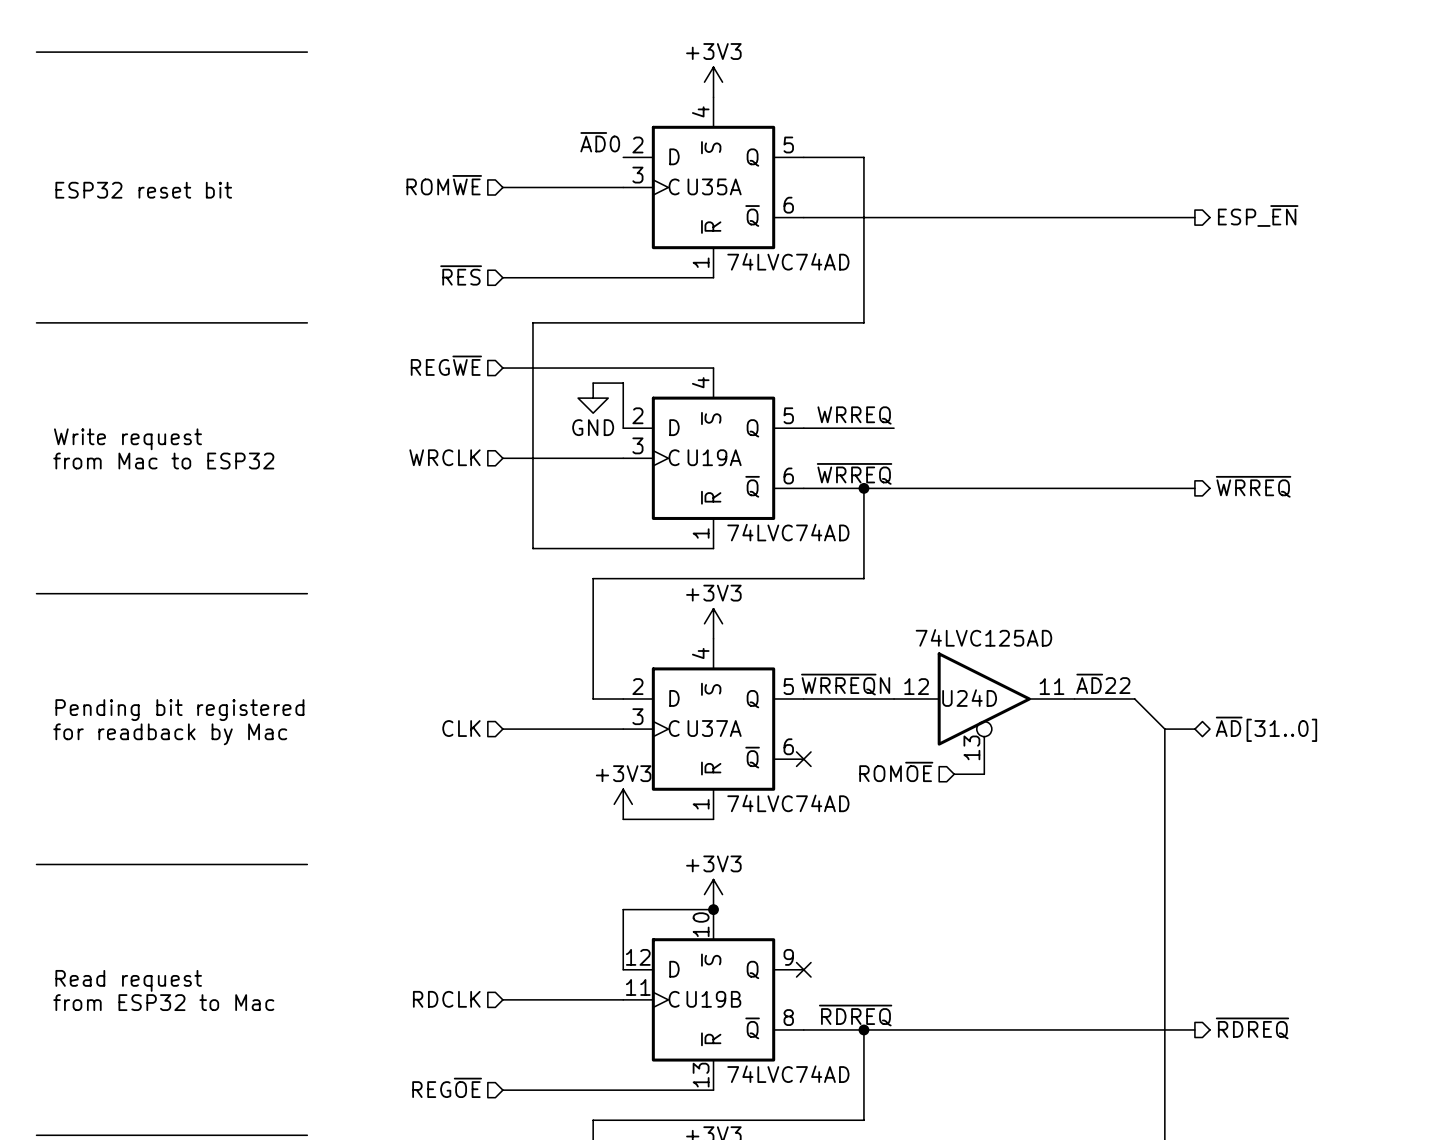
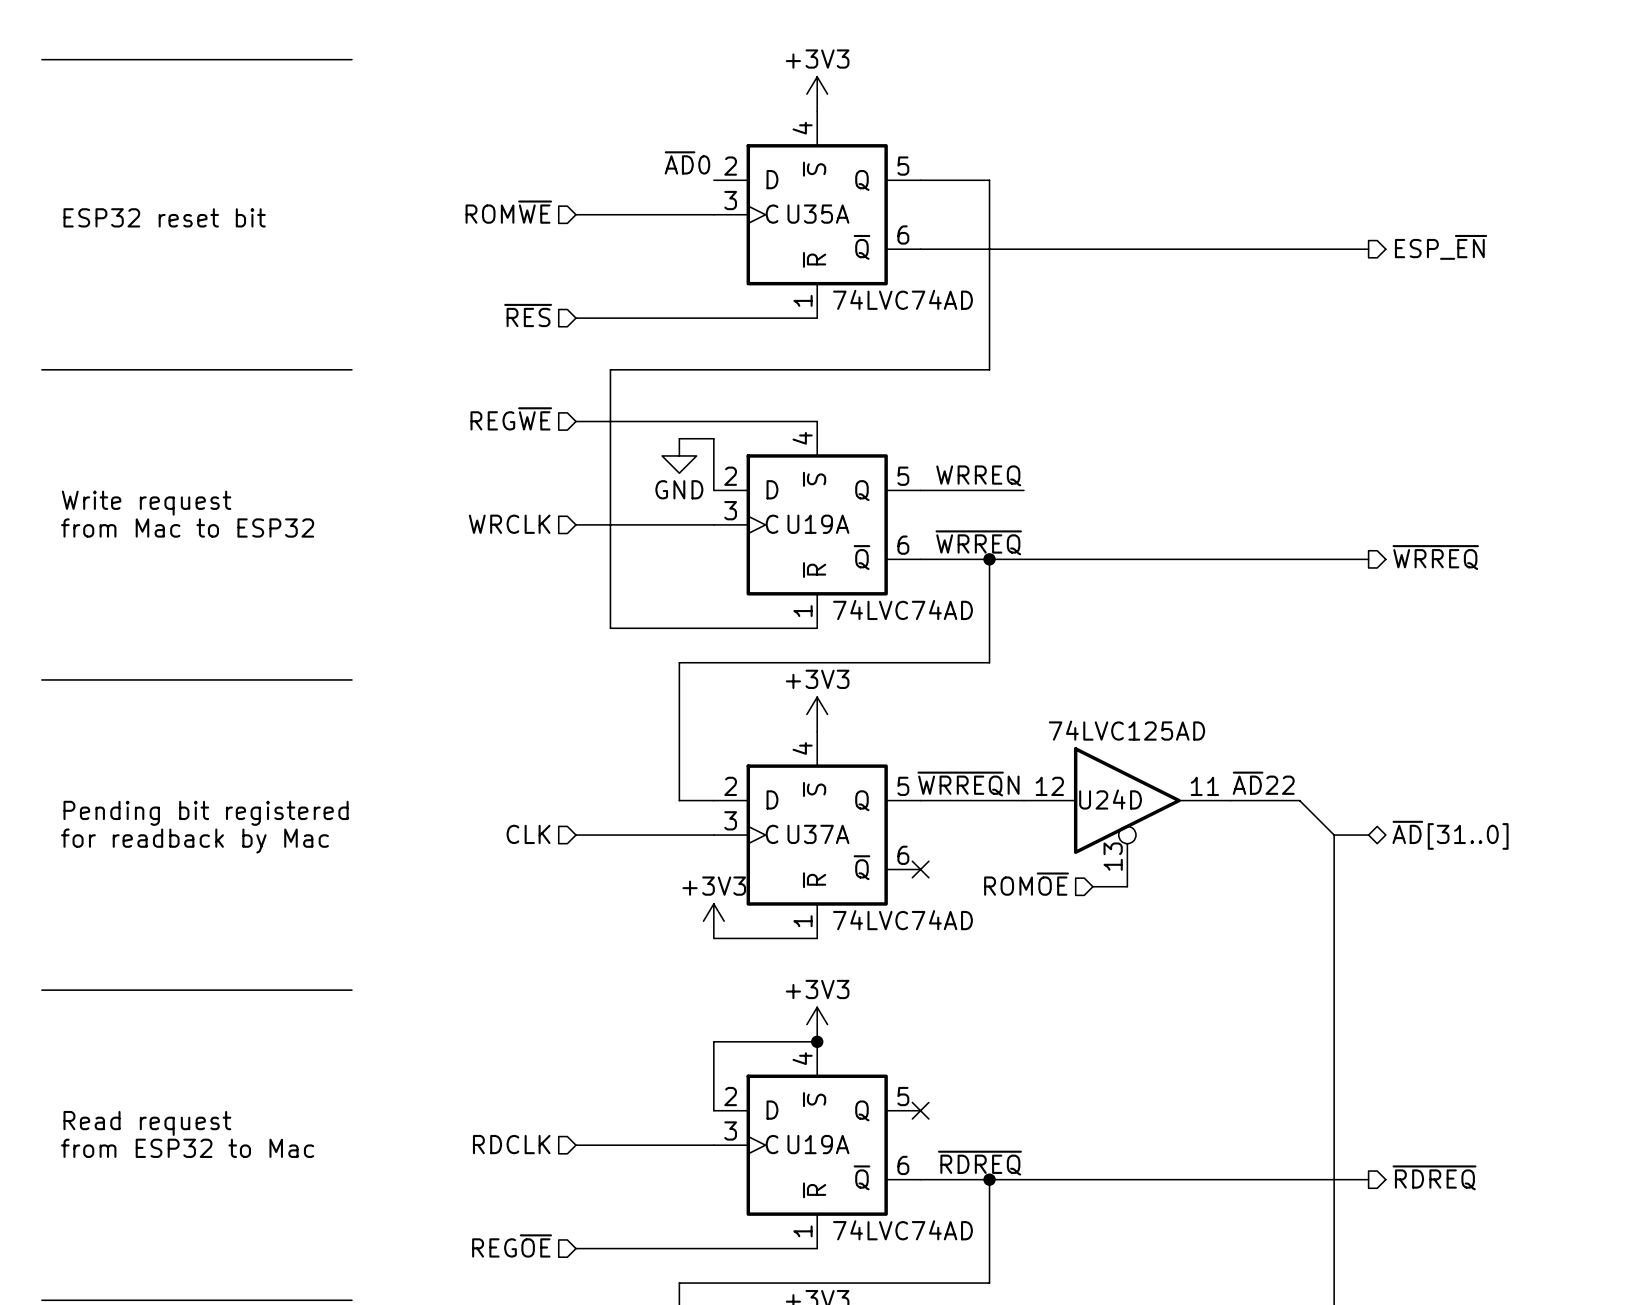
U19B pin number: 10 (701, 924) -> 4 (802, 1058)
U19B pin number: 12 (638, 957) -> 2 (730, 1096)
U19B pin number: 9 (788, 957) -> 5 (903, 1096)
U19B pin number: 11 (638, 987) -> 3 (730, 1130)
U19B name: U19B (713, 999) -> U19A (818, 1144)
U19B pin number: 8 (788, 1017) -> 6 (903, 1165)
U19B pin number: 13 (701, 1075) -> 1 (803, 1231)

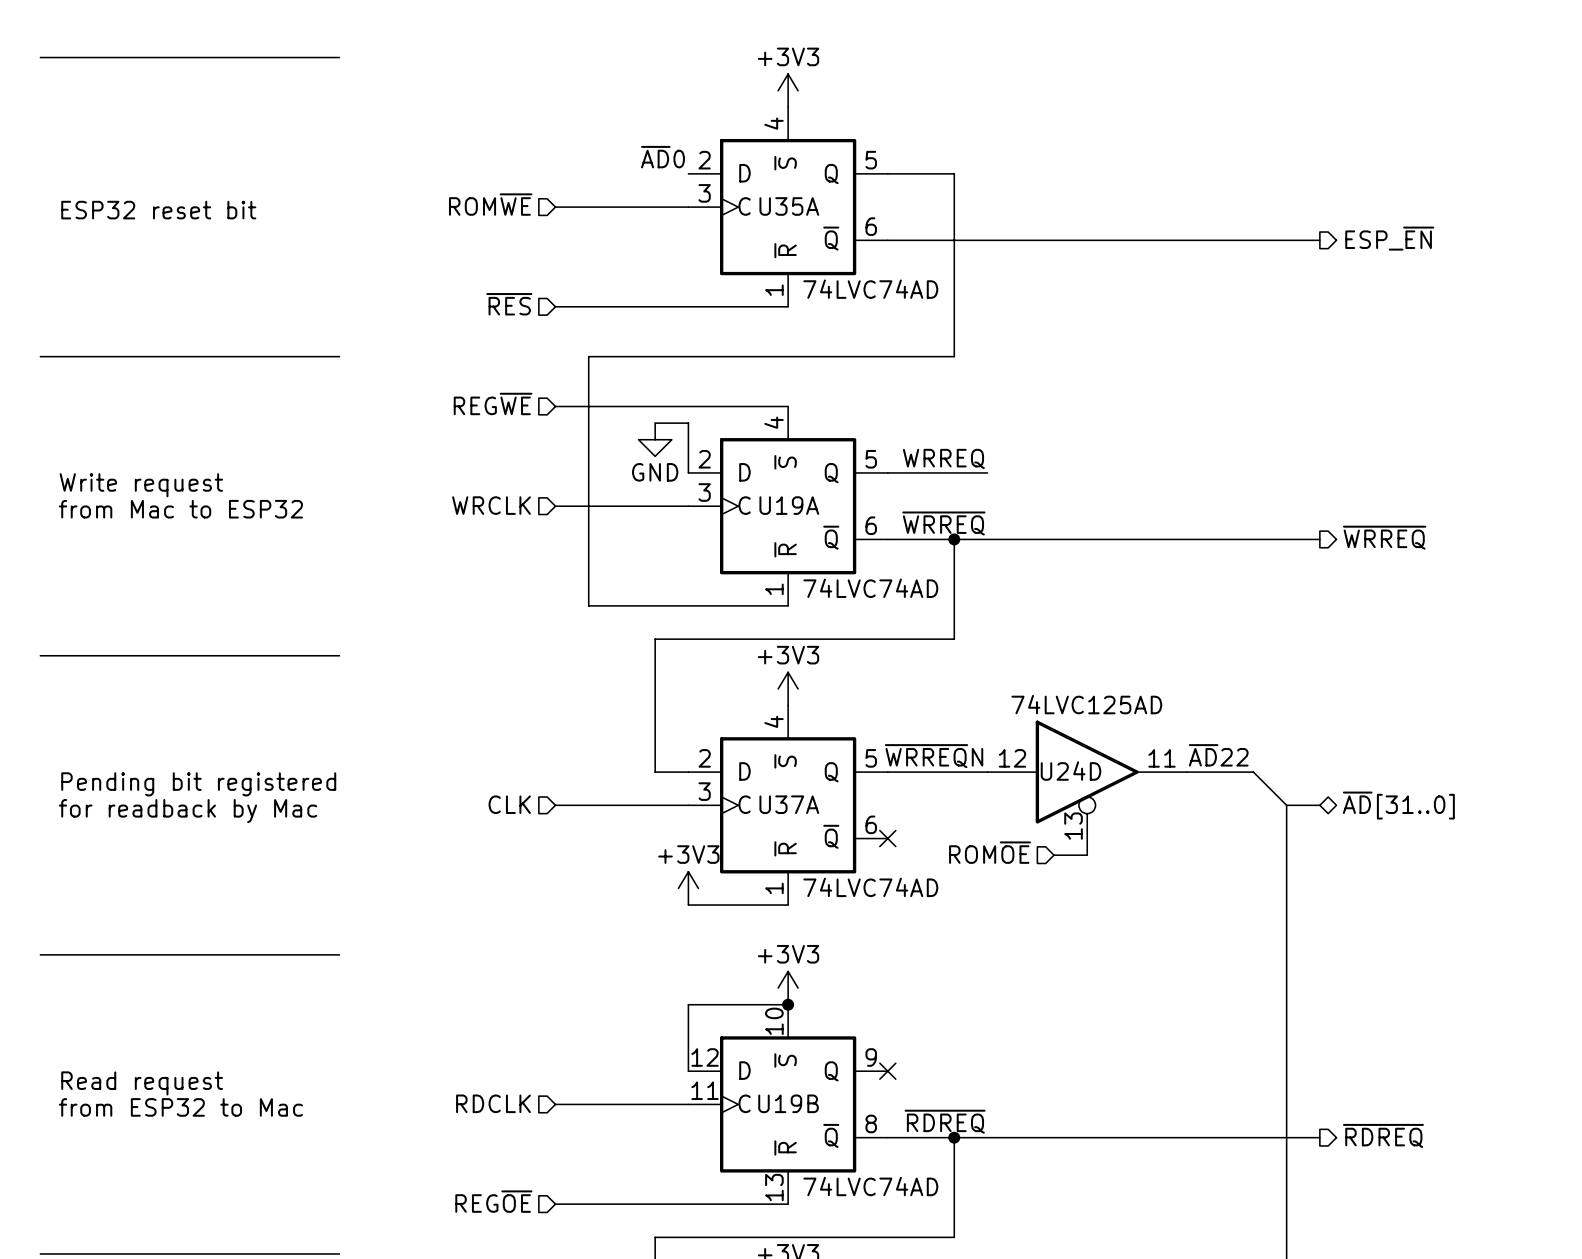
U19A pin number: 4 (802, 1058) -> 10 (774, 1021)
U19A pin number: 2 (730, 1096) -> 12 (705, 1057)
U19A pin number: 5 (903, 1096) -> 9 (871, 1057)
U19A pin number: 3 (730, 1130) -> 11 (705, 1090)
U19A name: U19A (818, 1144) -> U19B (788, 1103)
U19A pin number: 6 (903, 1165) -> 8 (871, 1123)
U19A pin number: 1 (803, 1231) -> 13 (774, 1187)

